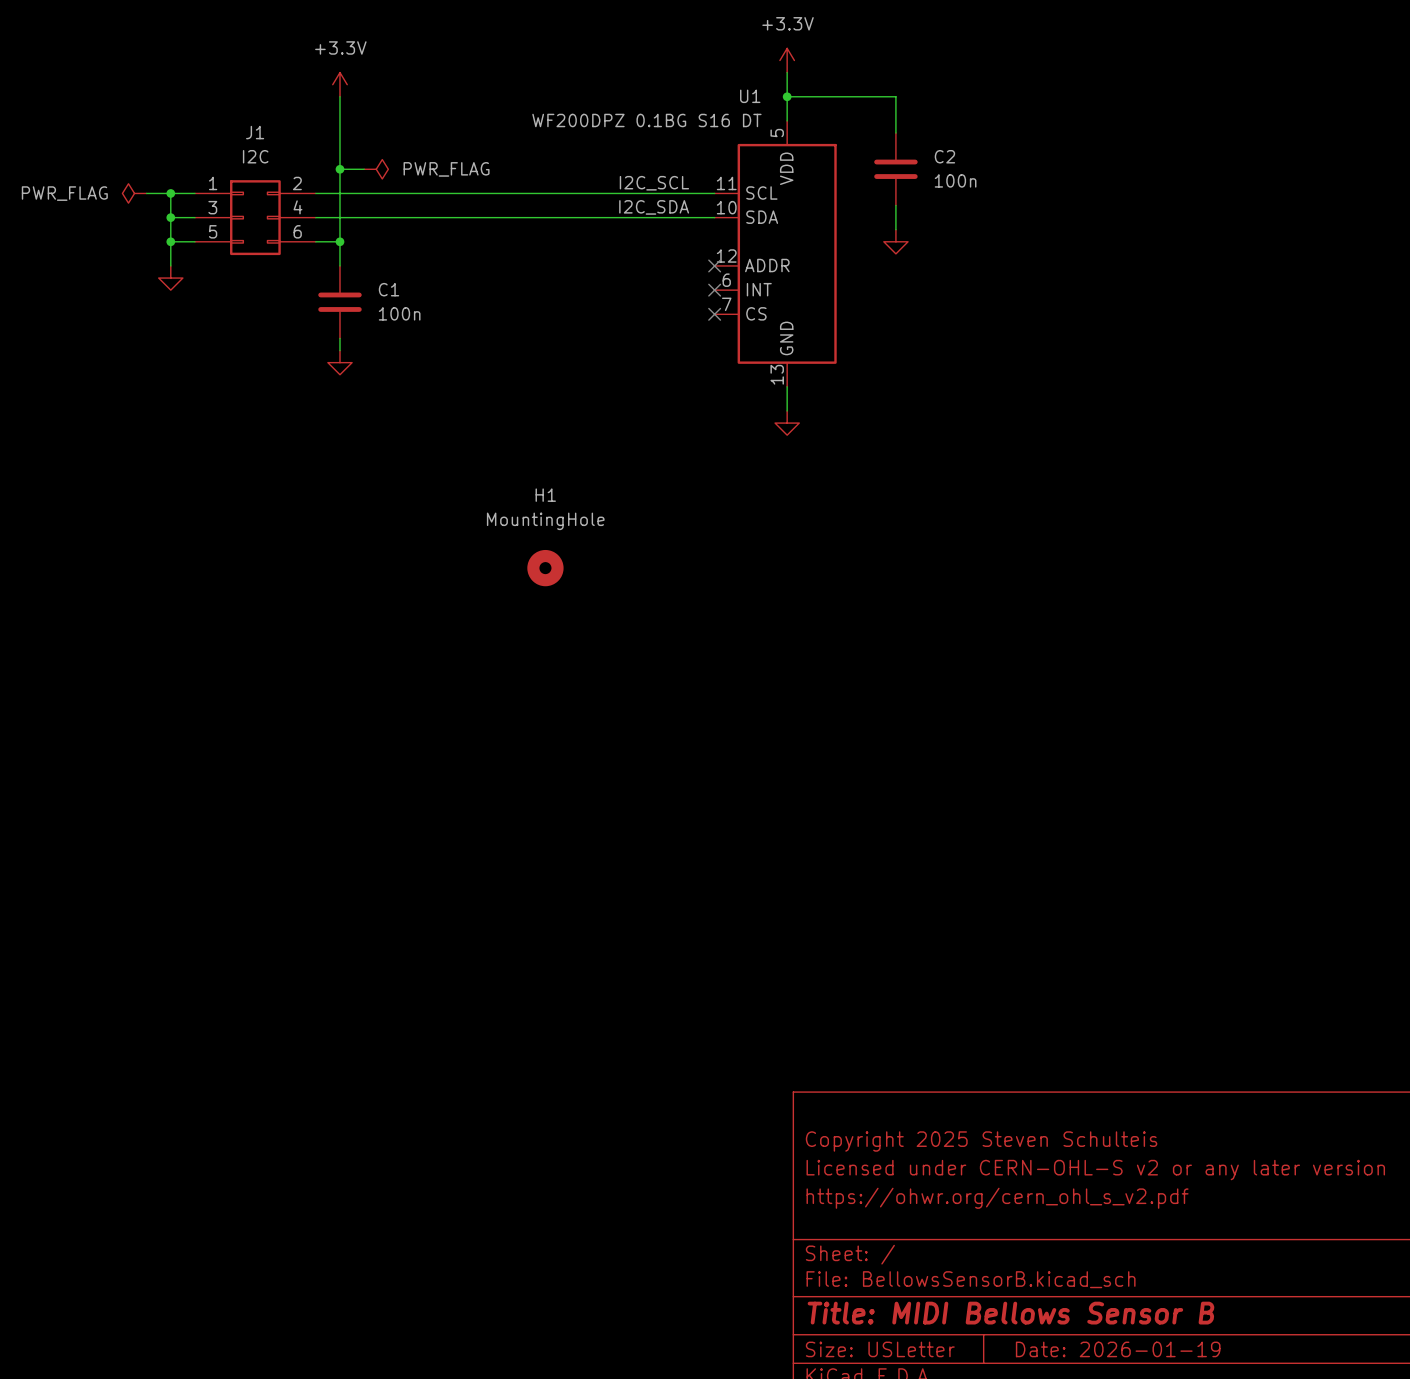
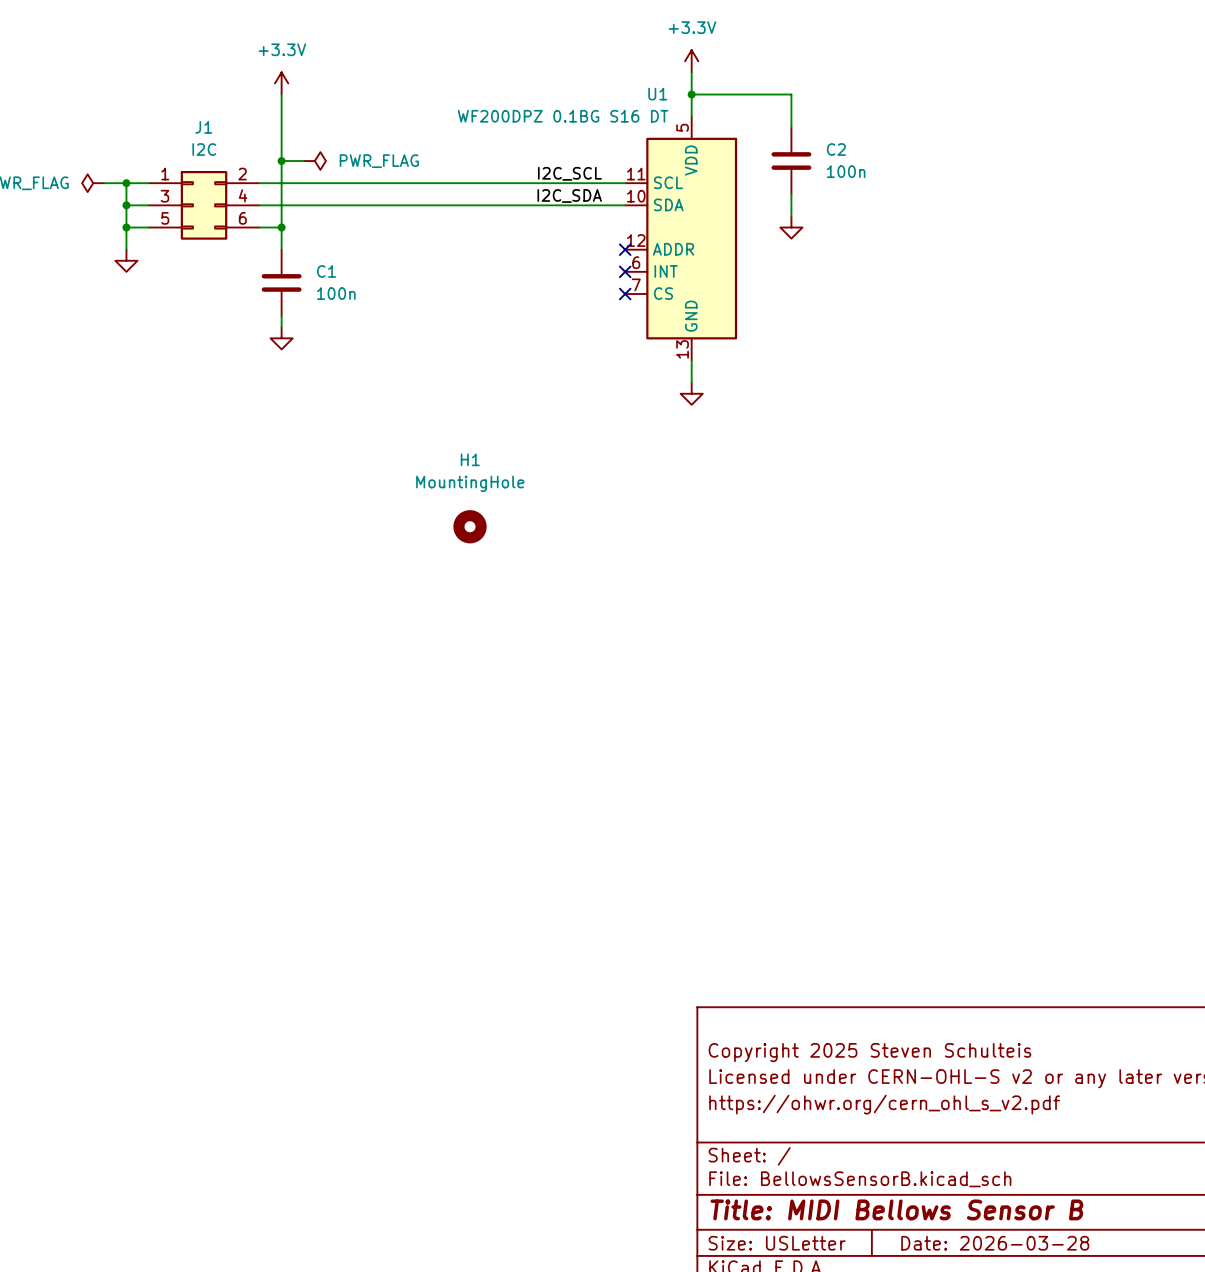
title block: Date: 2026-01-19 (1118, 1349) -> Date: 2026-03-28 (995, 1243)

